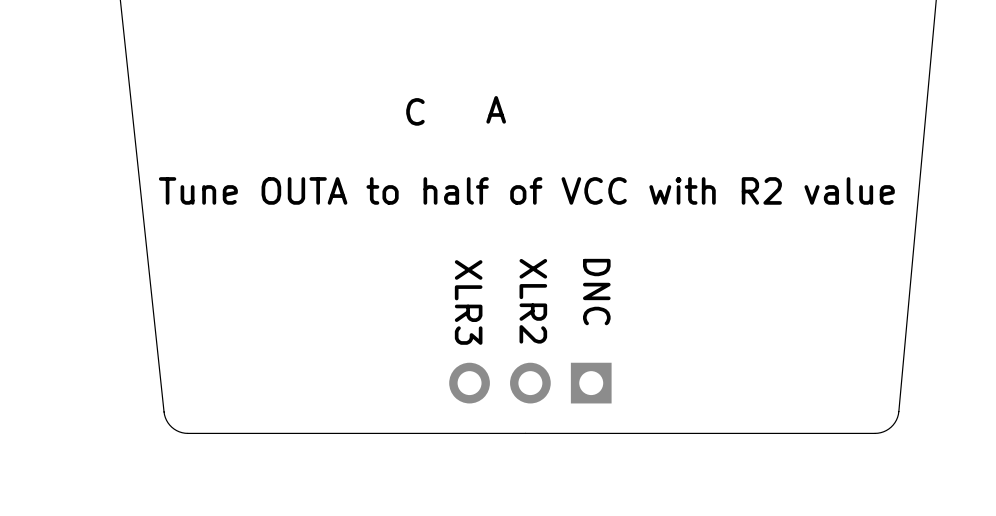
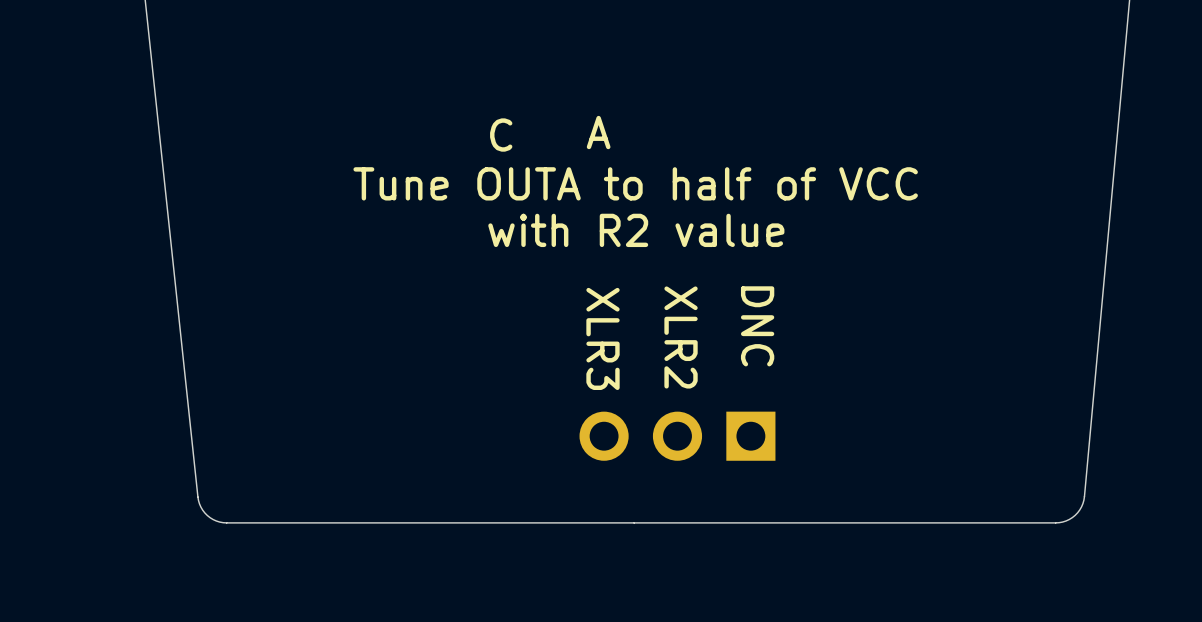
text: none -> Tune OUTA to half of VCC (635, 183)
text: Tune OUTA to half of VCC with R2 value (526, 190) -> with R2 value (636, 230)
text position: DNC (596, 292) -> DNC (757, 326)
text position: XLR2 (533, 301) -> XLR2 (681, 337)
text position: XLR3 (468, 302) -> XLR3 (603, 338)
part position: (530, 383) -> (677, 436)

